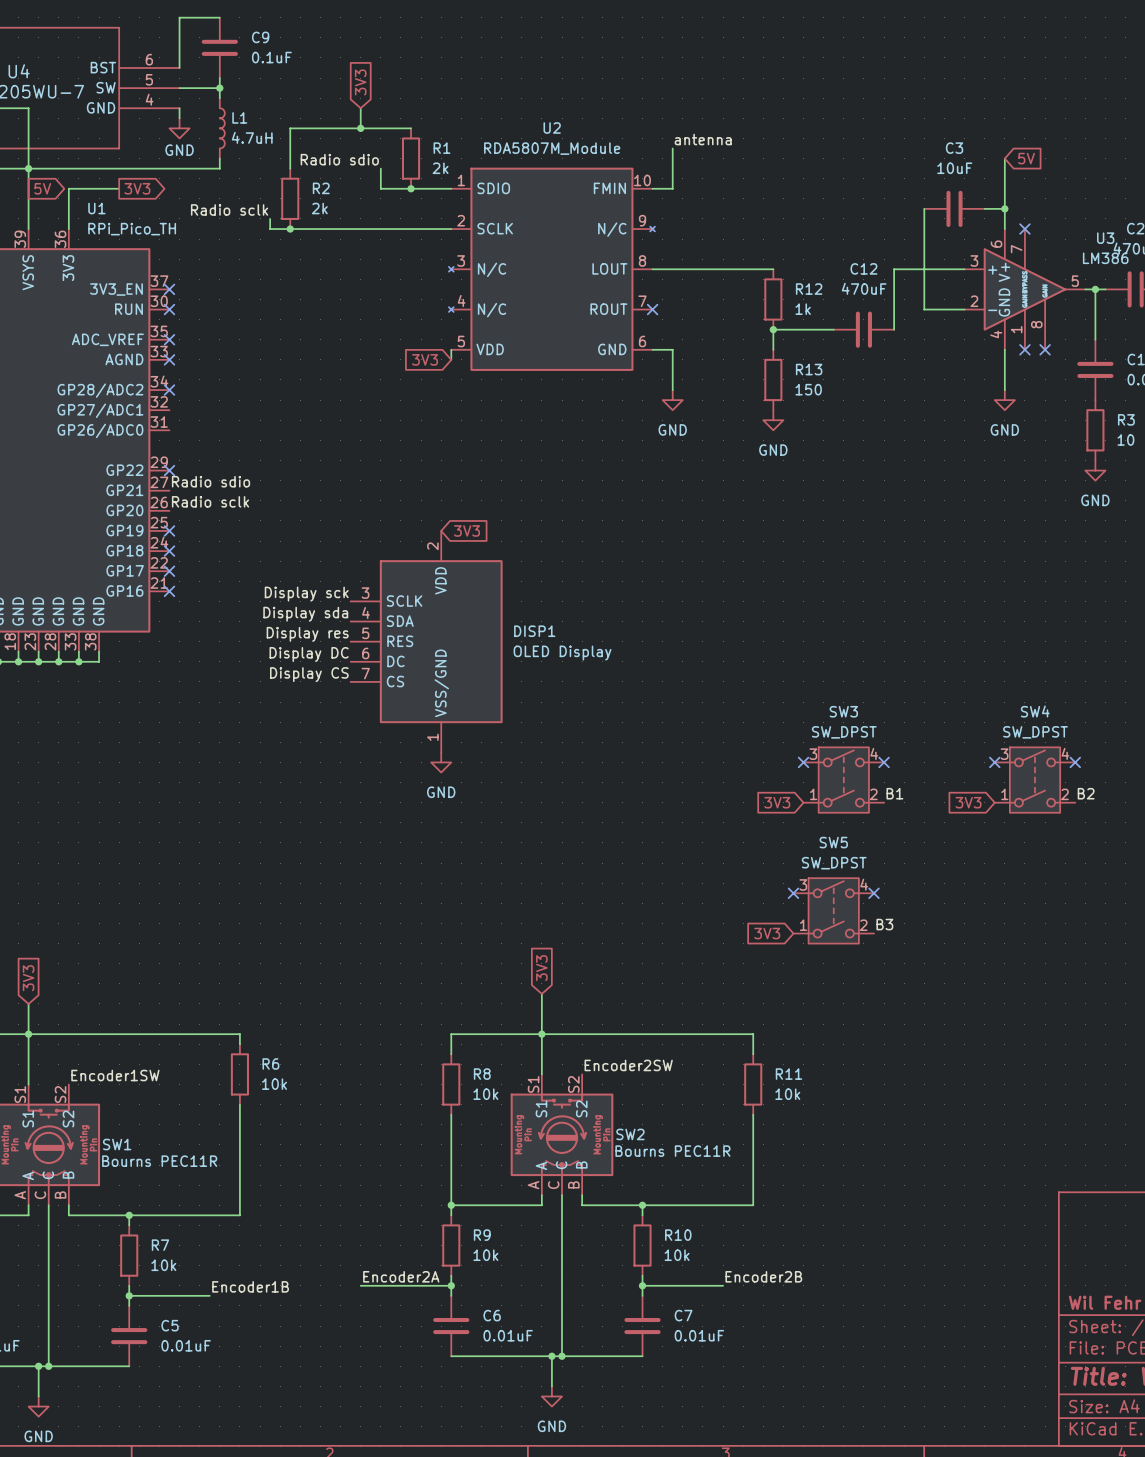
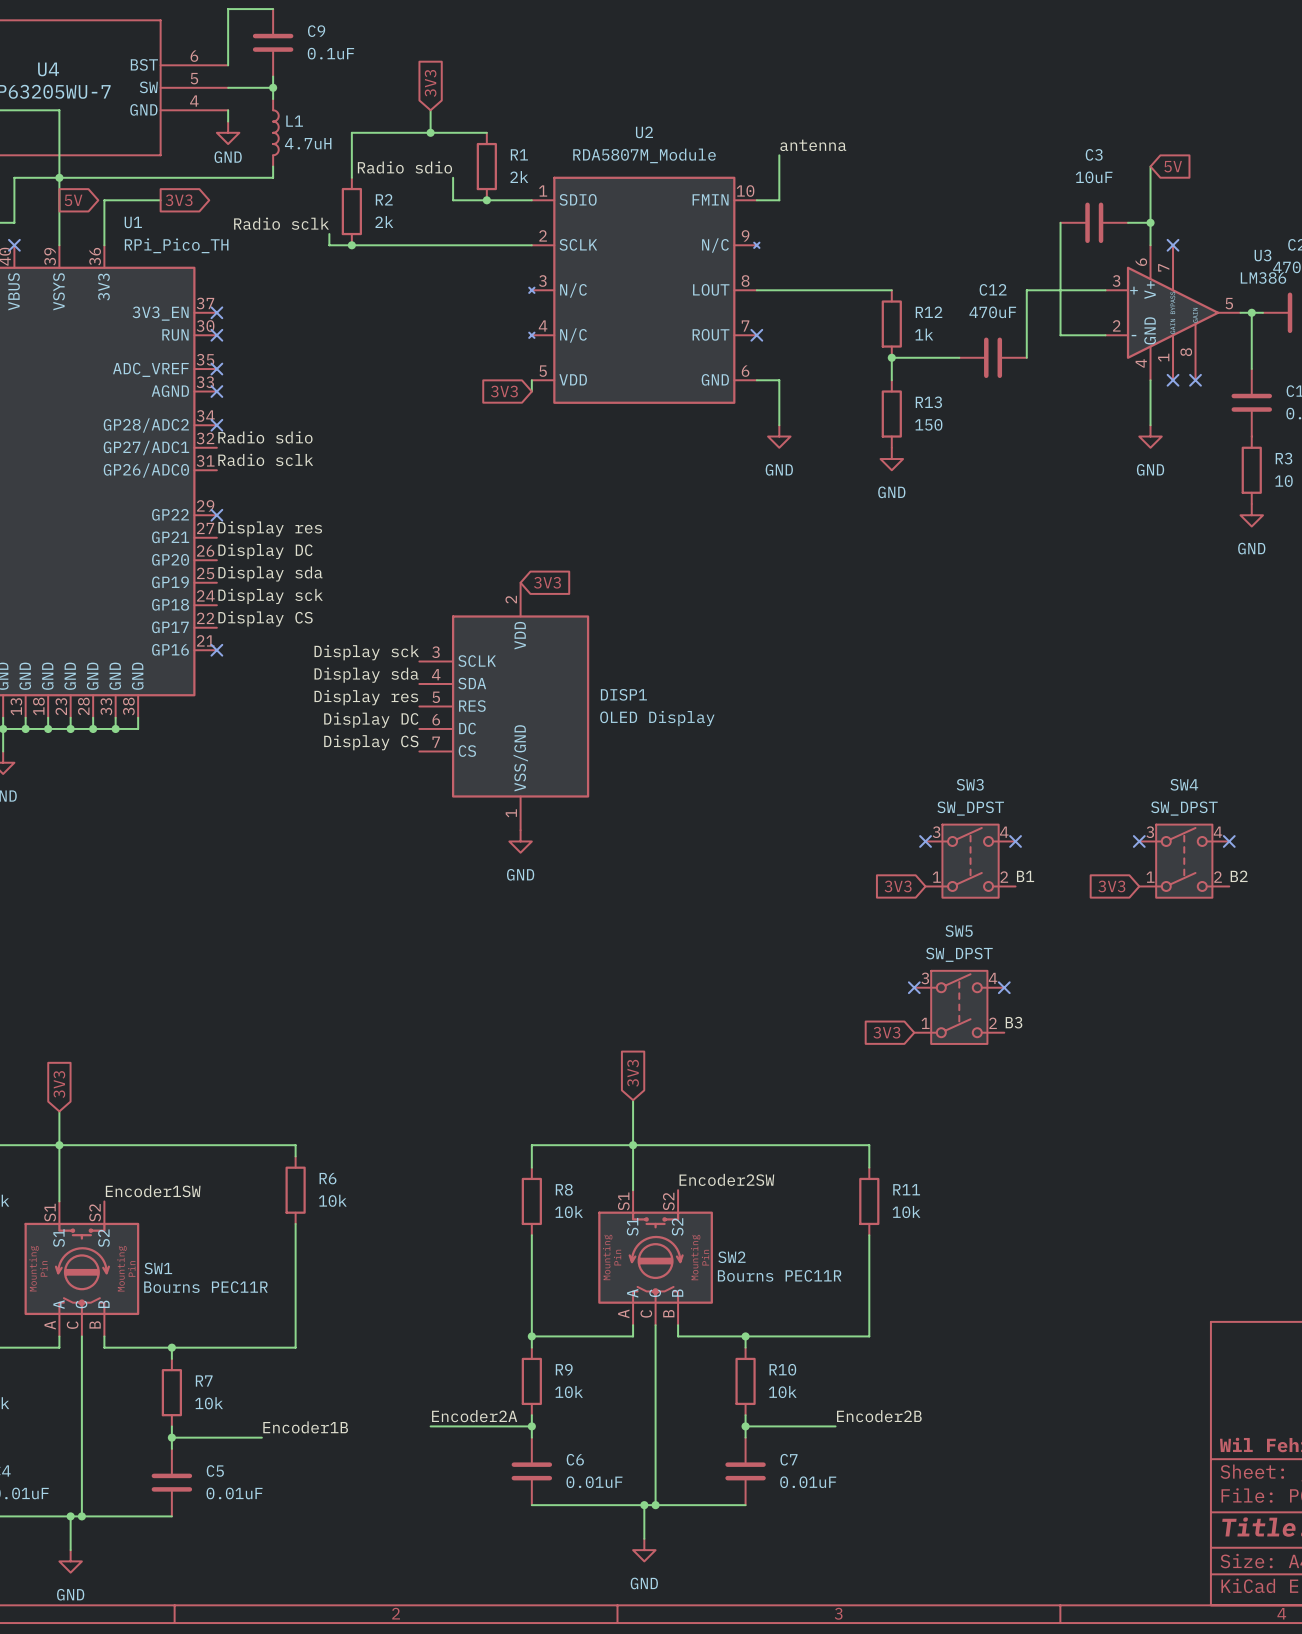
label: none -> Radio sdio (265, 437)
label: none -> Radio sclk (265, 459)
label: Radio sdio (211, 481) -> Display res (270, 528)
label: Radio sclk (210, 501) -> Display DC (265, 551)
label: none -> Display sda (270, 573)
no-connect mark: (169, 530) -> none
label: none -> Display sck (270, 596)
no-connect mark: (169, 551) -> none
label: none -> Display CS (265, 618)
no-connect mark: (169, 571) -> none

